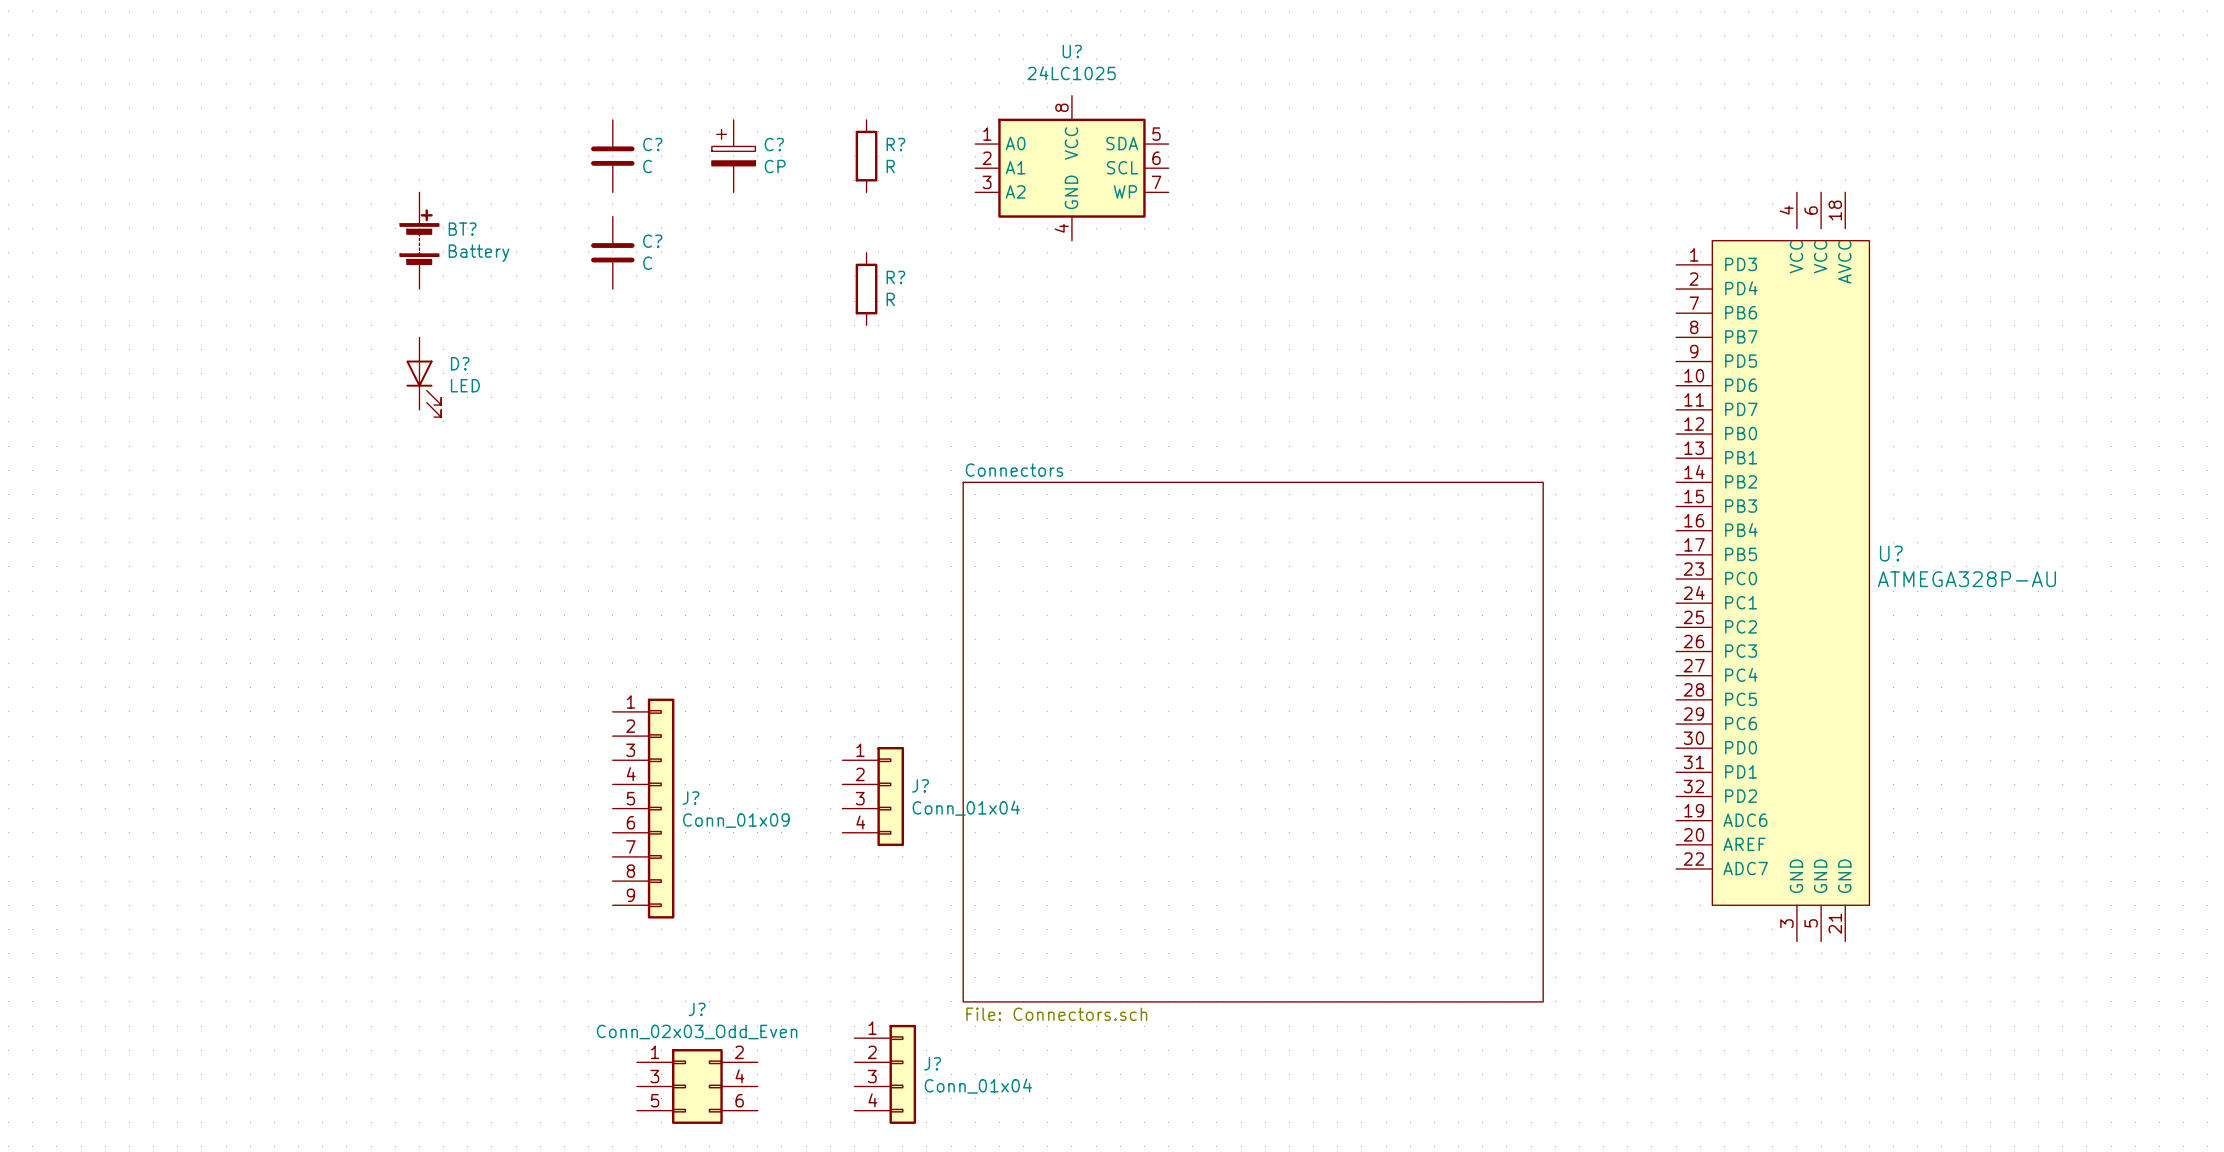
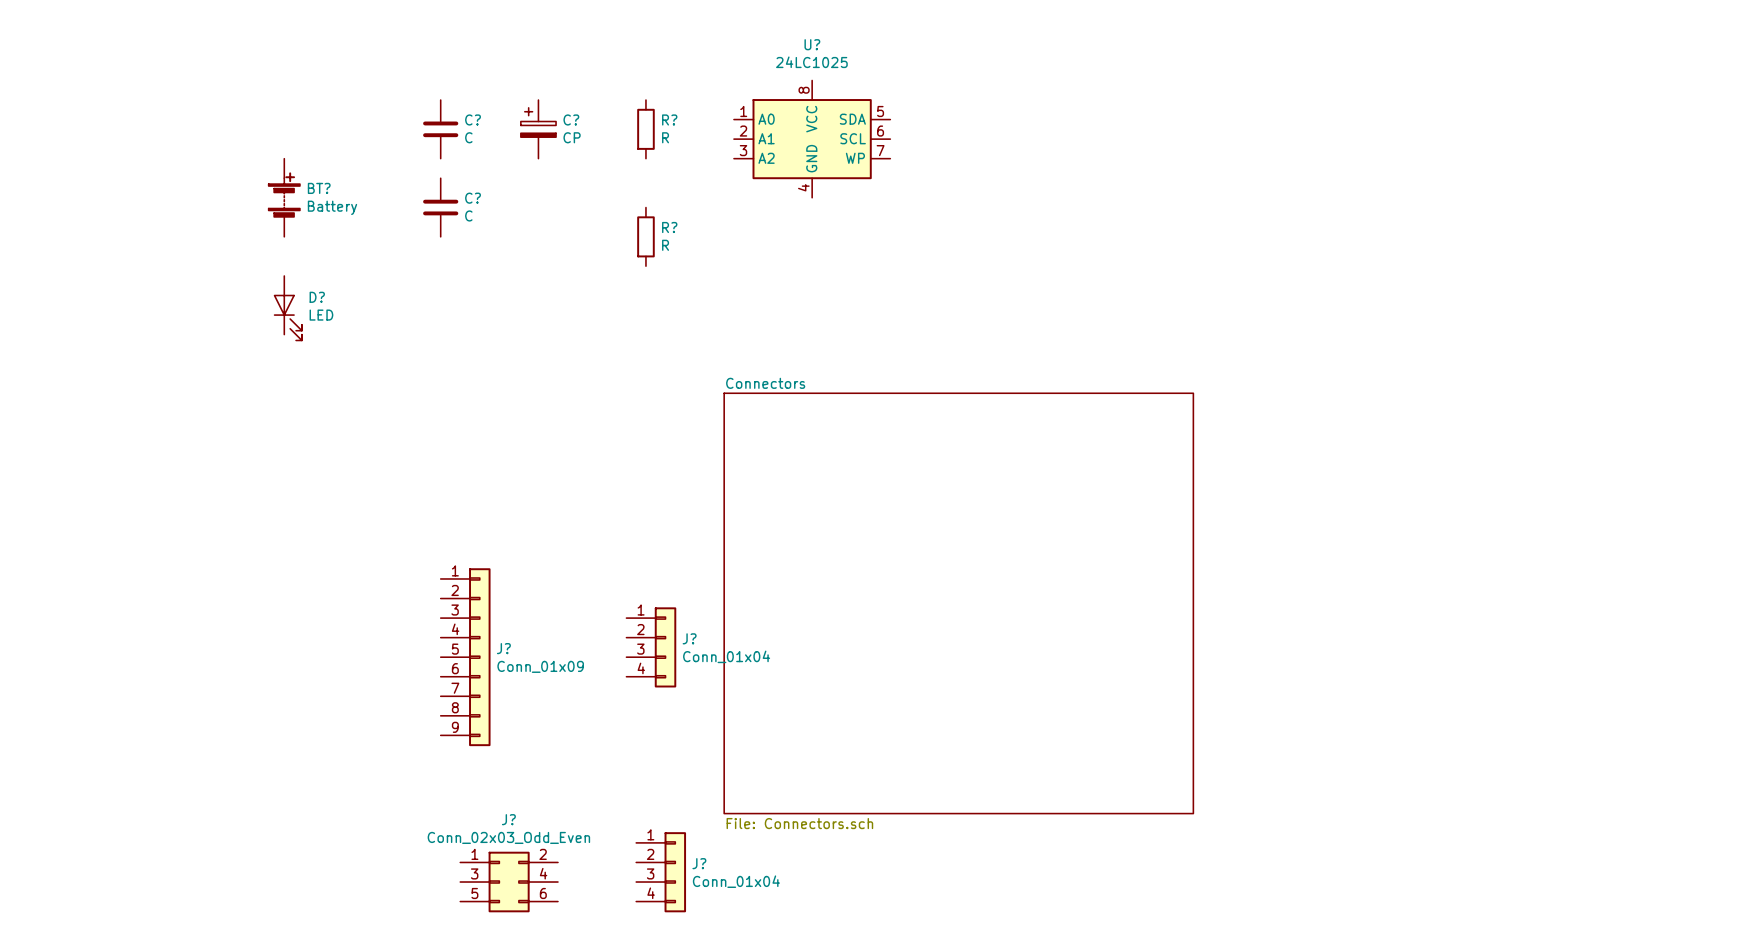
U?: ATMEGA328P-AU (1772, 566) -> none

